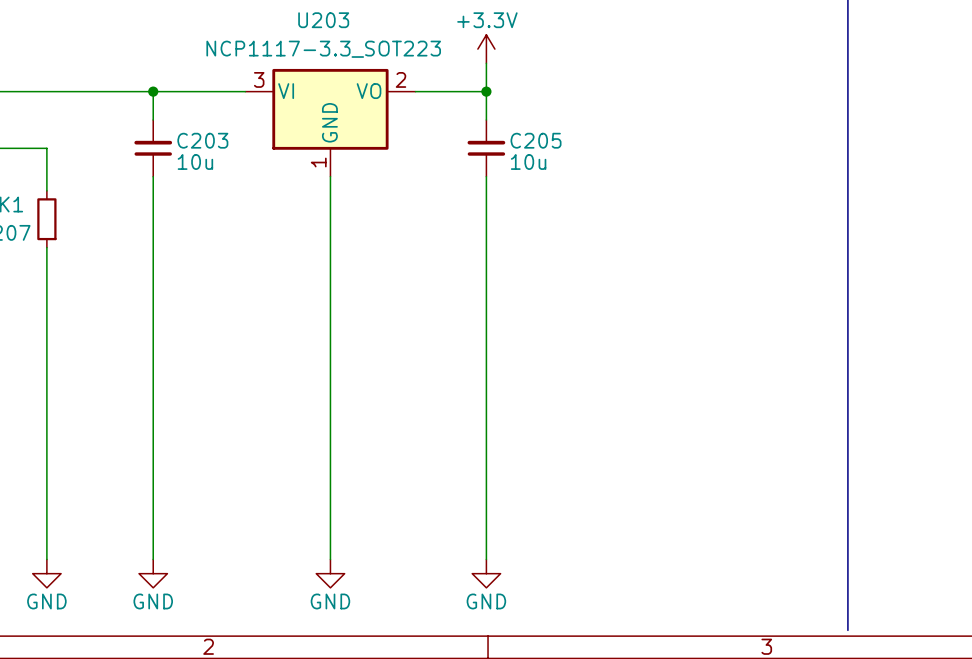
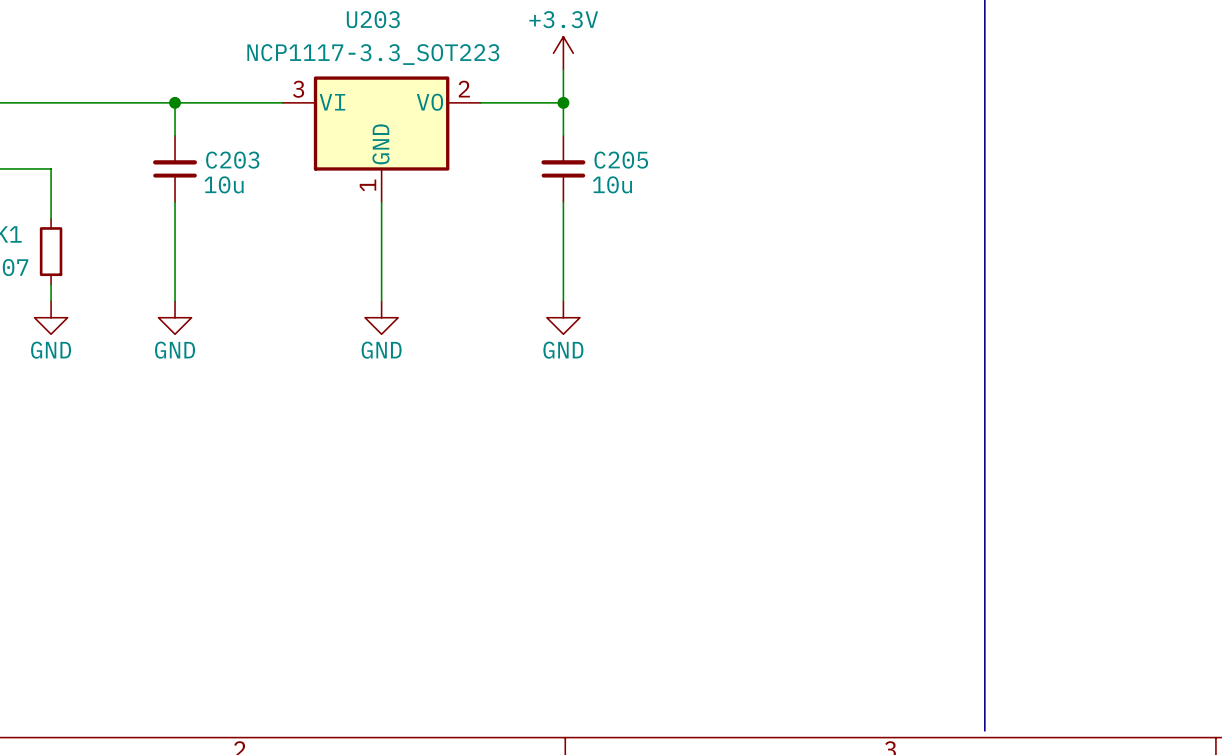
wire: (46, 261) (46, 559) -> none
wire: (153, 261) (153, 559) -> none
wire: (330, 261) (330, 559) -> none
wire: (486, 261) (486, 559) -> none
power symbol: none -> GND (51, 317)
power symbol: none -> GND (175, 317)
power symbol: none -> GND (381, 317)
power symbol: none -> GND (563, 317)
power symbol: GND (46, 573) -> none
power symbol: GND (153, 573) -> none
power symbol: GND (330, 573) -> none
power symbol: GND (486, 573) -> none

